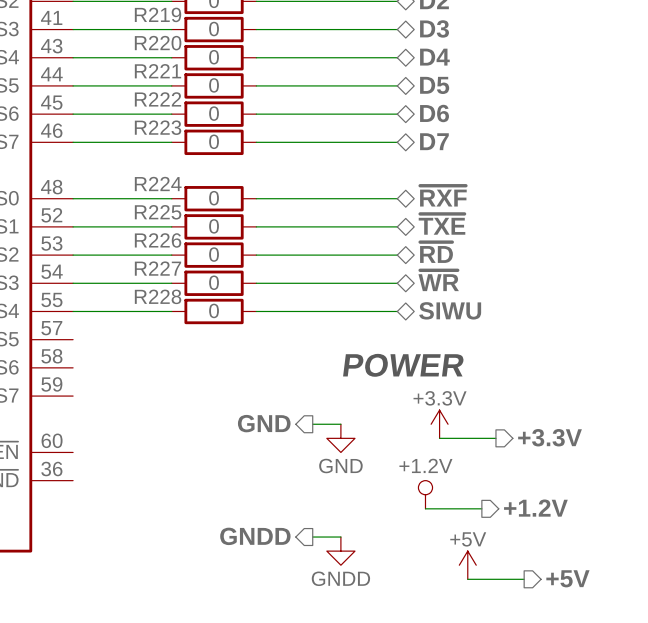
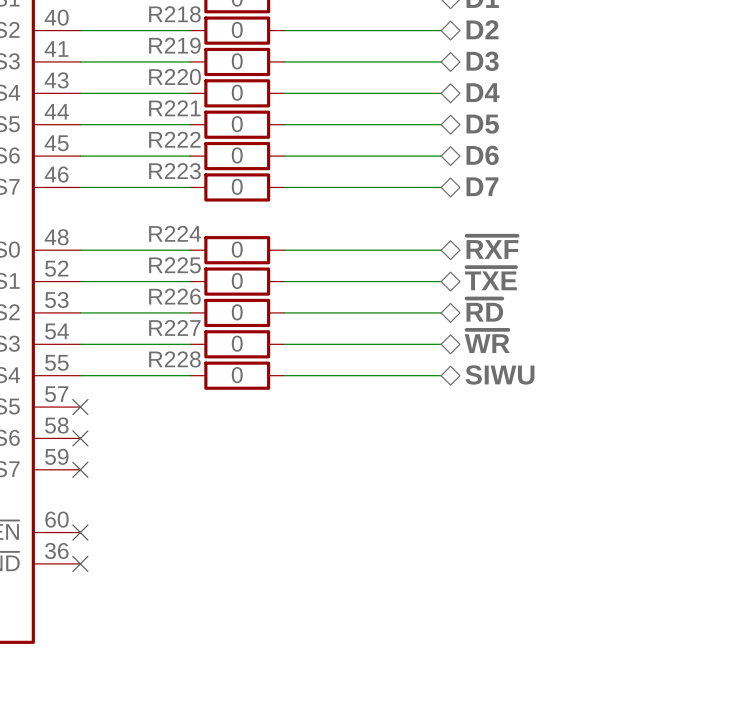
no-connect mark: none -> (80, 407)
text: POWER (403, 365) -> none
no-connect mark: none -> (80, 438)
no-connect mark: none -> (80, 469)
hierarchical label: GND (264, 423) -> none
wire: (312, 424) (340, 424) -> none
power symbol: +3.3V (439, 424) -> none
hierarchical label: +3.3V (550, 437) -> none
power symbol: GND (340, 438) -> none
wire: (439, 438) (495, 438) -> none
no-connect mark: none -> (80, 532)
no-connect mark: none -> (80, 563)
power symbol: +1.2V (425, 494) -> none
wire: (425, 508) (481, 508) -> none
hierarchical label: +1.2V (535, 508) -> none
hierarchical label: GNDD (255, 536) -> none
wire: (312, 537) (340, 537) -> none
power symbol: GNDD (340, 551) -> none
power symbol: +5V (467, 565) -> none
hierarchical label: +5V (567, 578) -> none
wire: (467, 579) (524, 579) -> none

